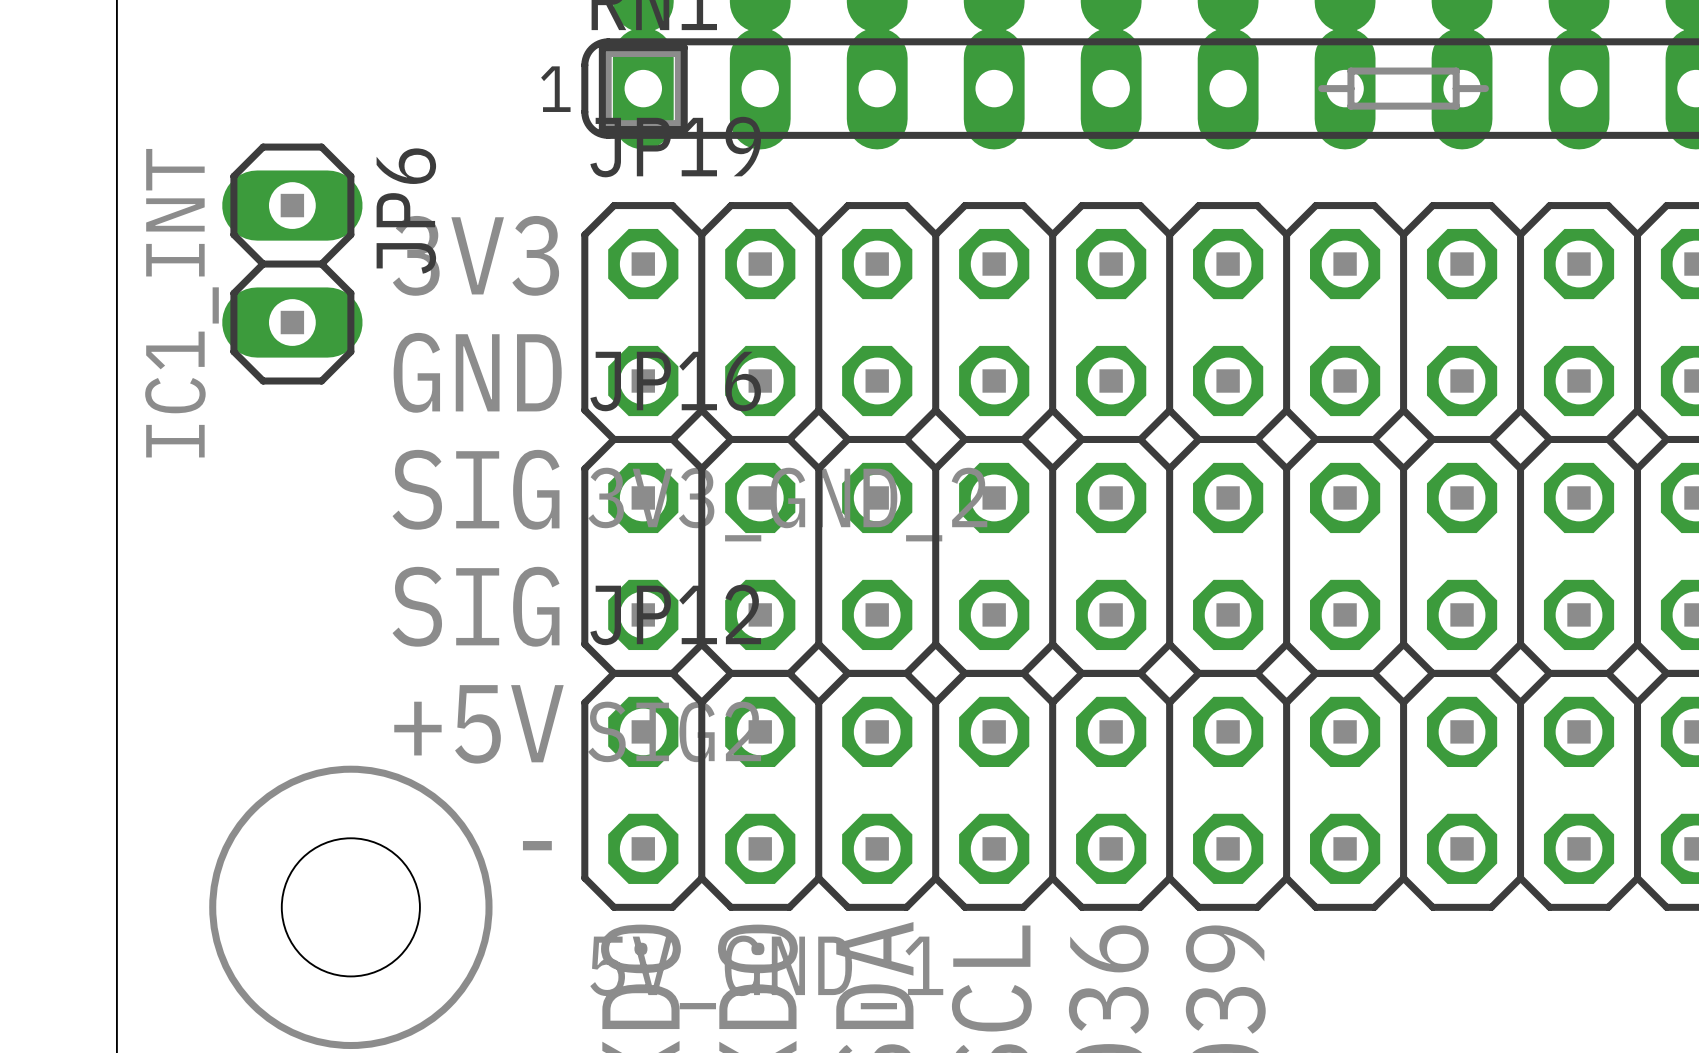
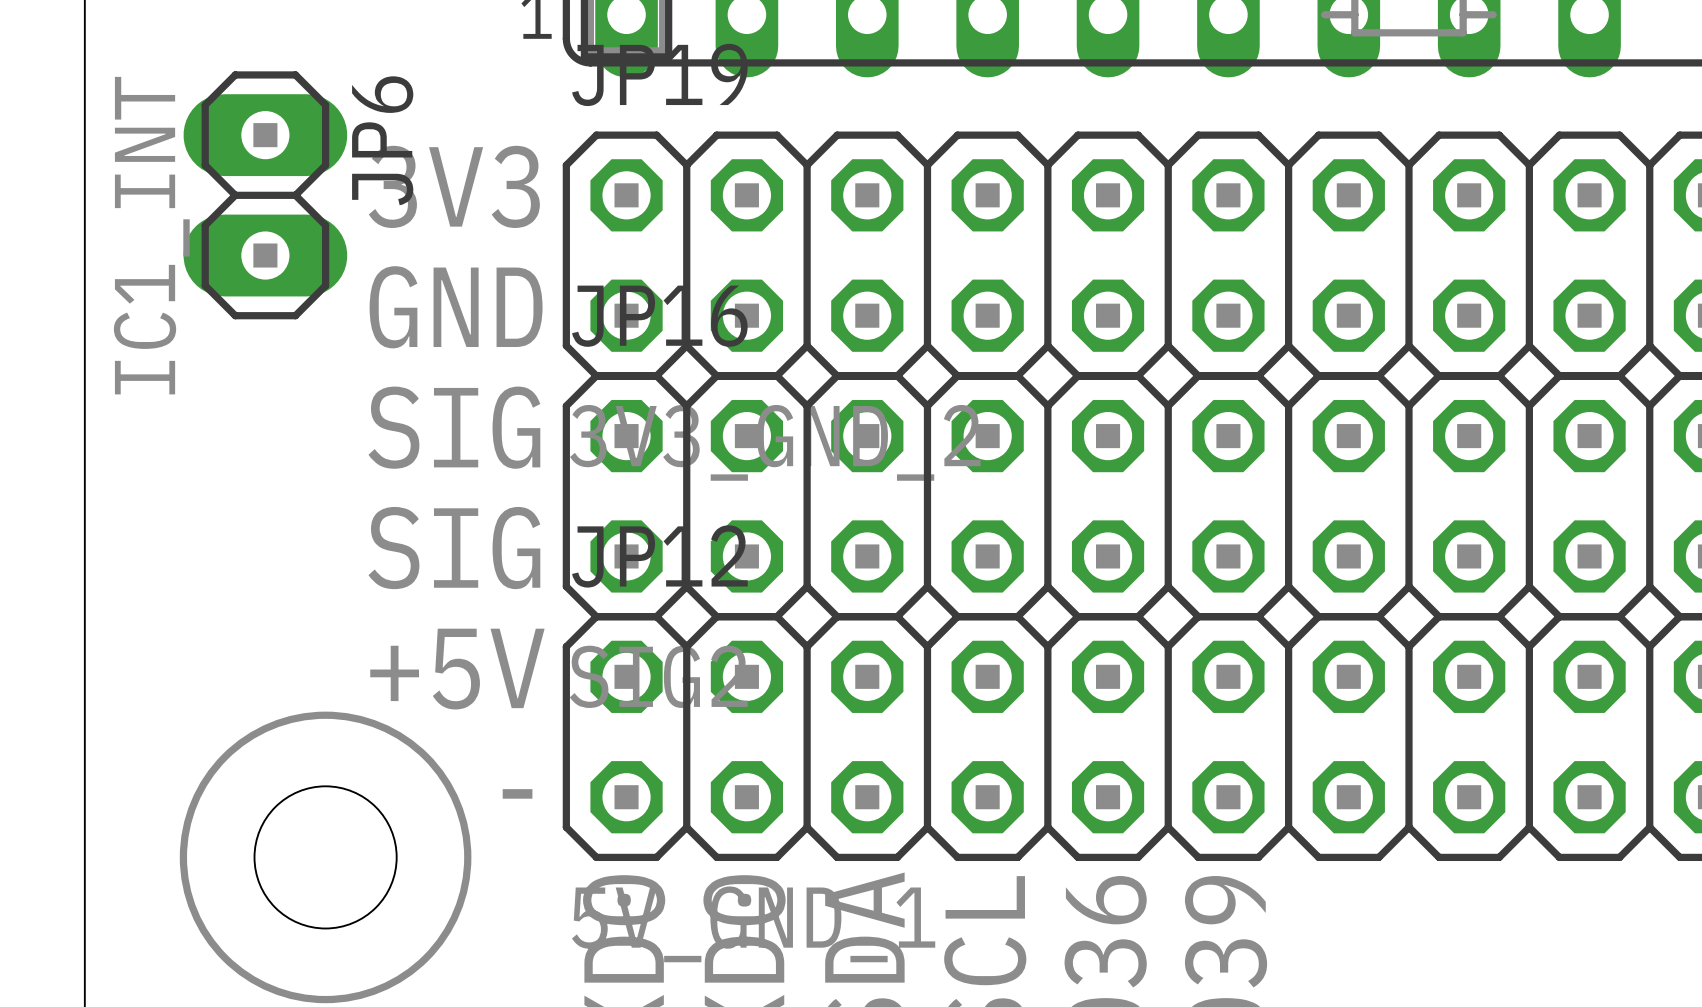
JP6 footprint: [222, 143, 363, 385] -> [183, 71, 348, 320]

